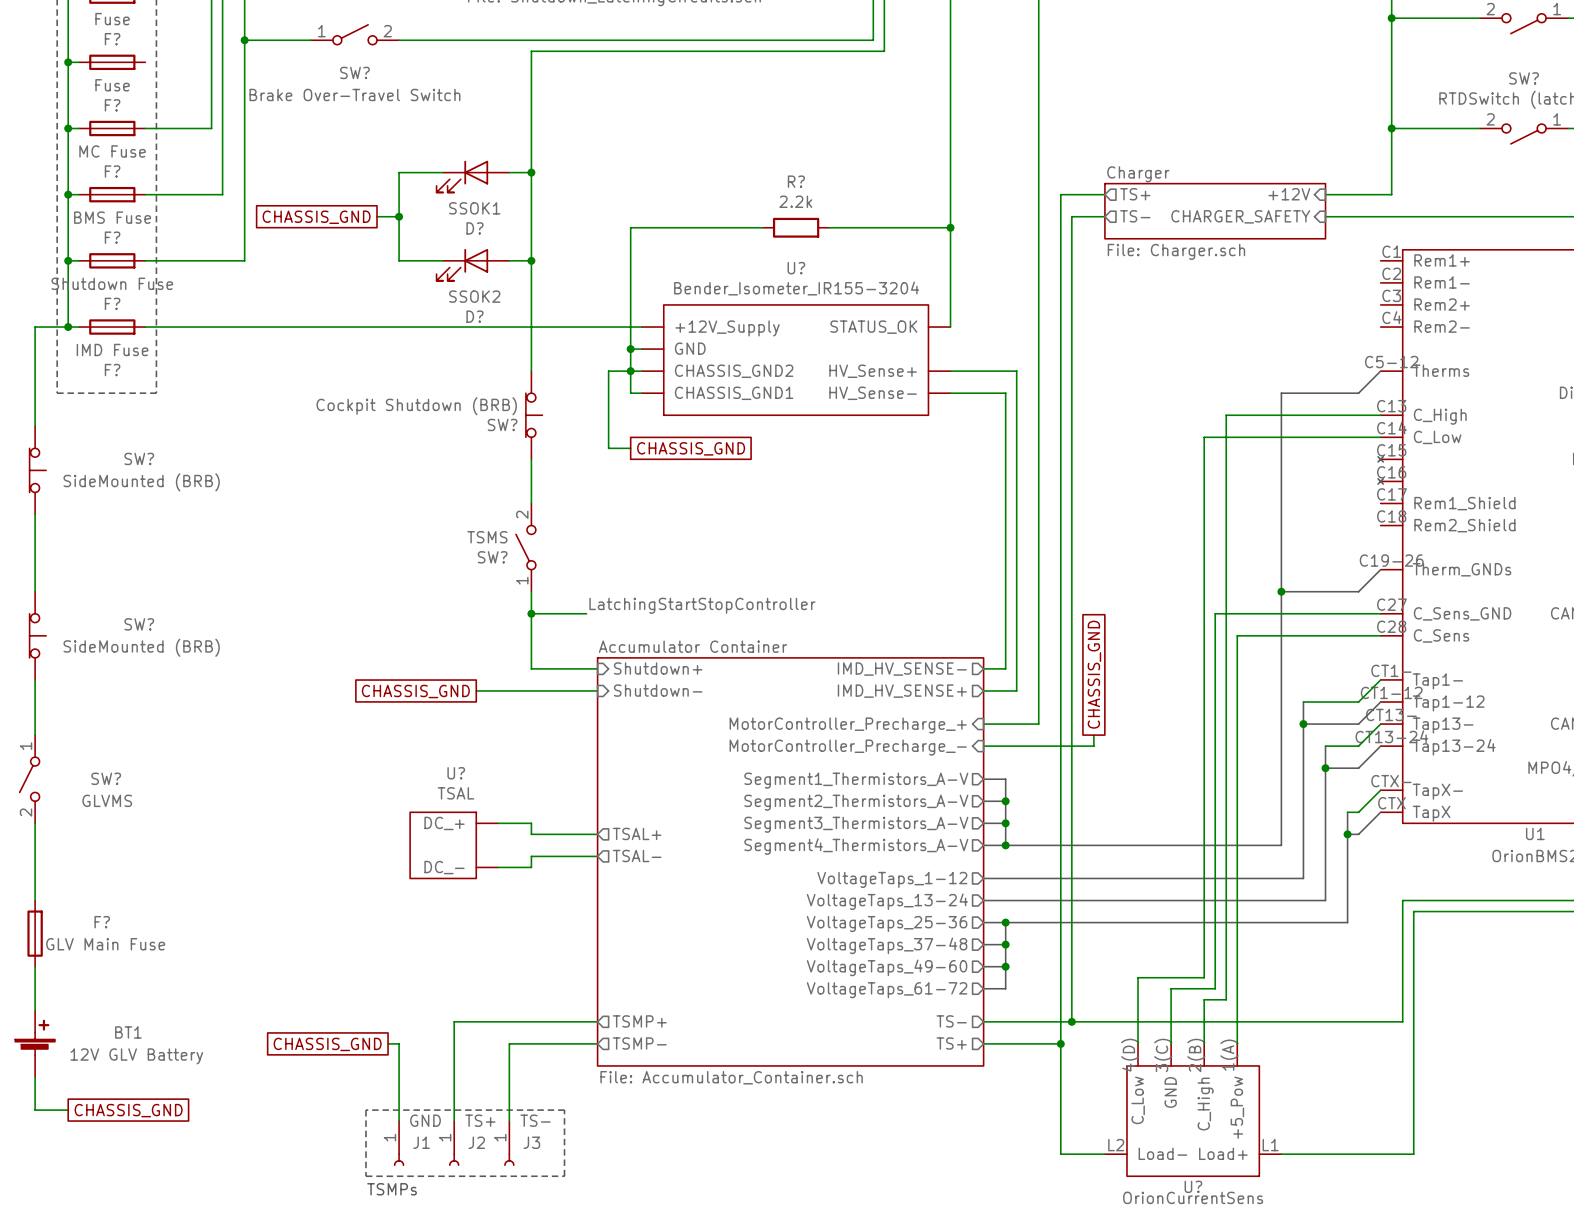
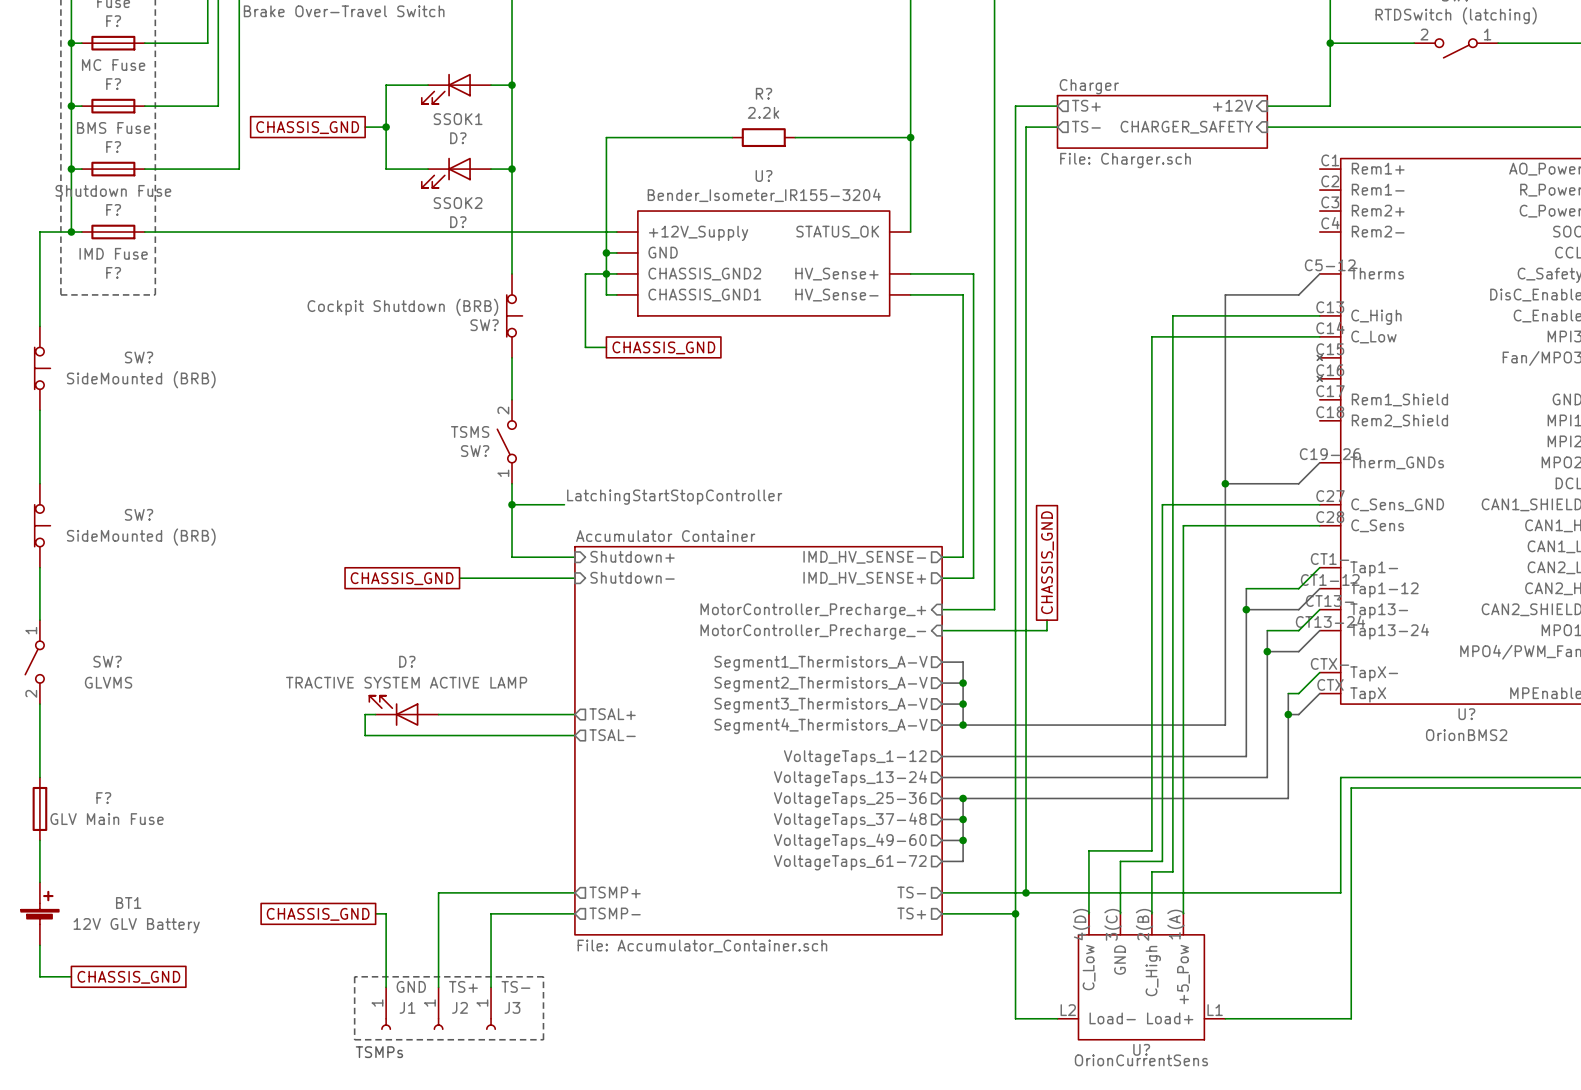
wire: (498, 823) (531, 823) (531, 834) -> (438, 714) (512, 714)
D?: none -> TRACTIVE SYSTEM ACTIVE LAMP (403, 710)
U1 name: U1 (1535, 833) -> U? (1466, 714)
U?: TSAL (454, 845) -> none
wire: (531, 856) (531, 867) (498, 867) -> (512, 735) (365, 735) (365, 714) (375, 714)

